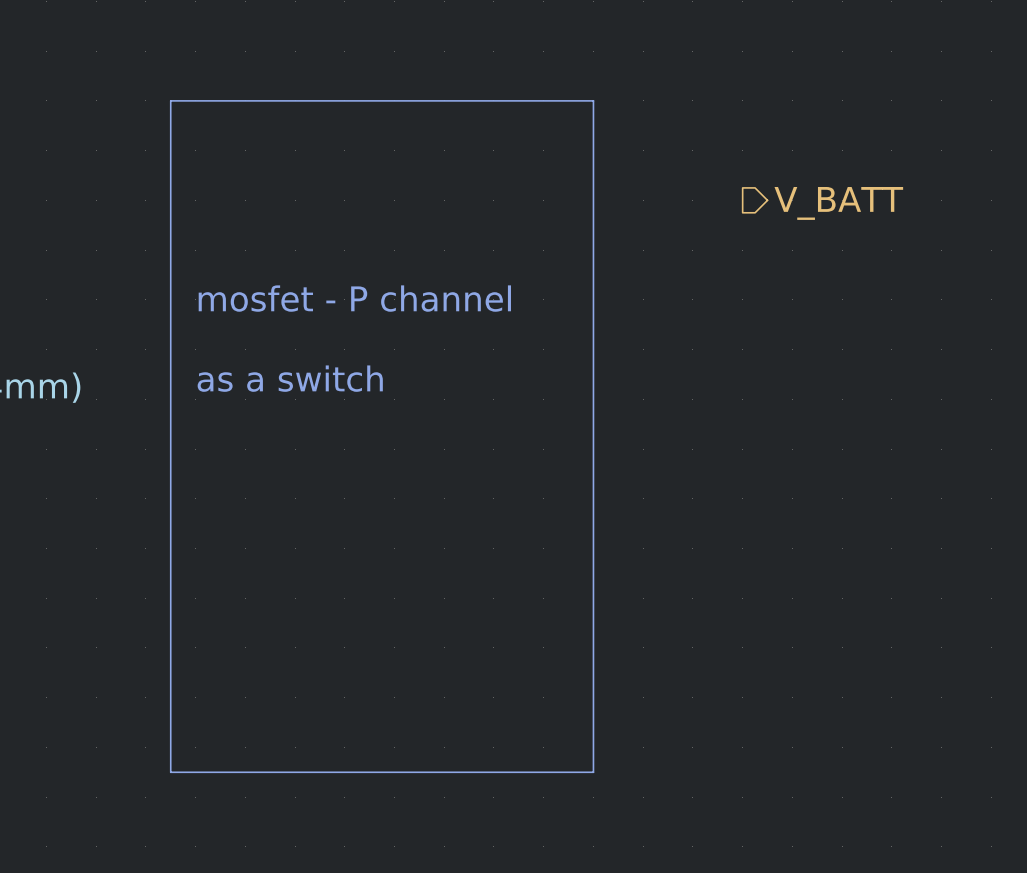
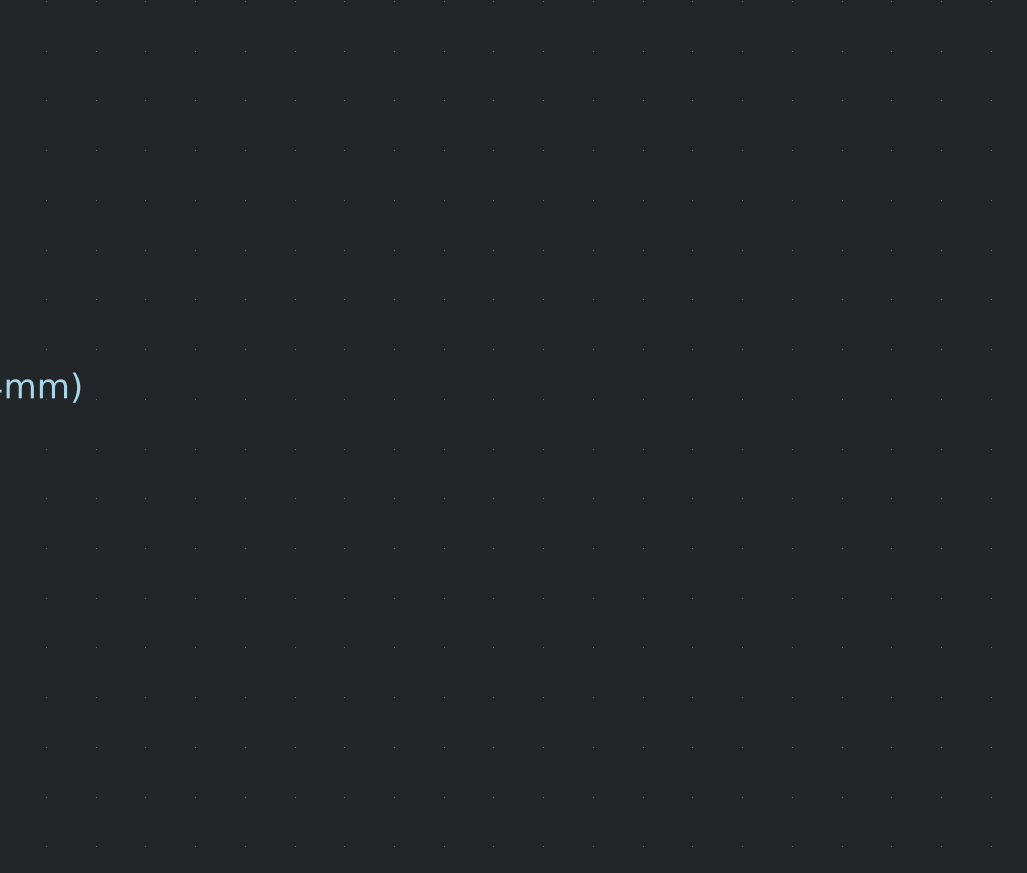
line: (170, 100) (593, 100) (593, 772) (170, 772) (170, 100) -> none
hierarchical label: V_BATT (838, 203) -> none
text: mosfet - P channel (354, 298) -> none
text: as a switch (290, 378) -> none

